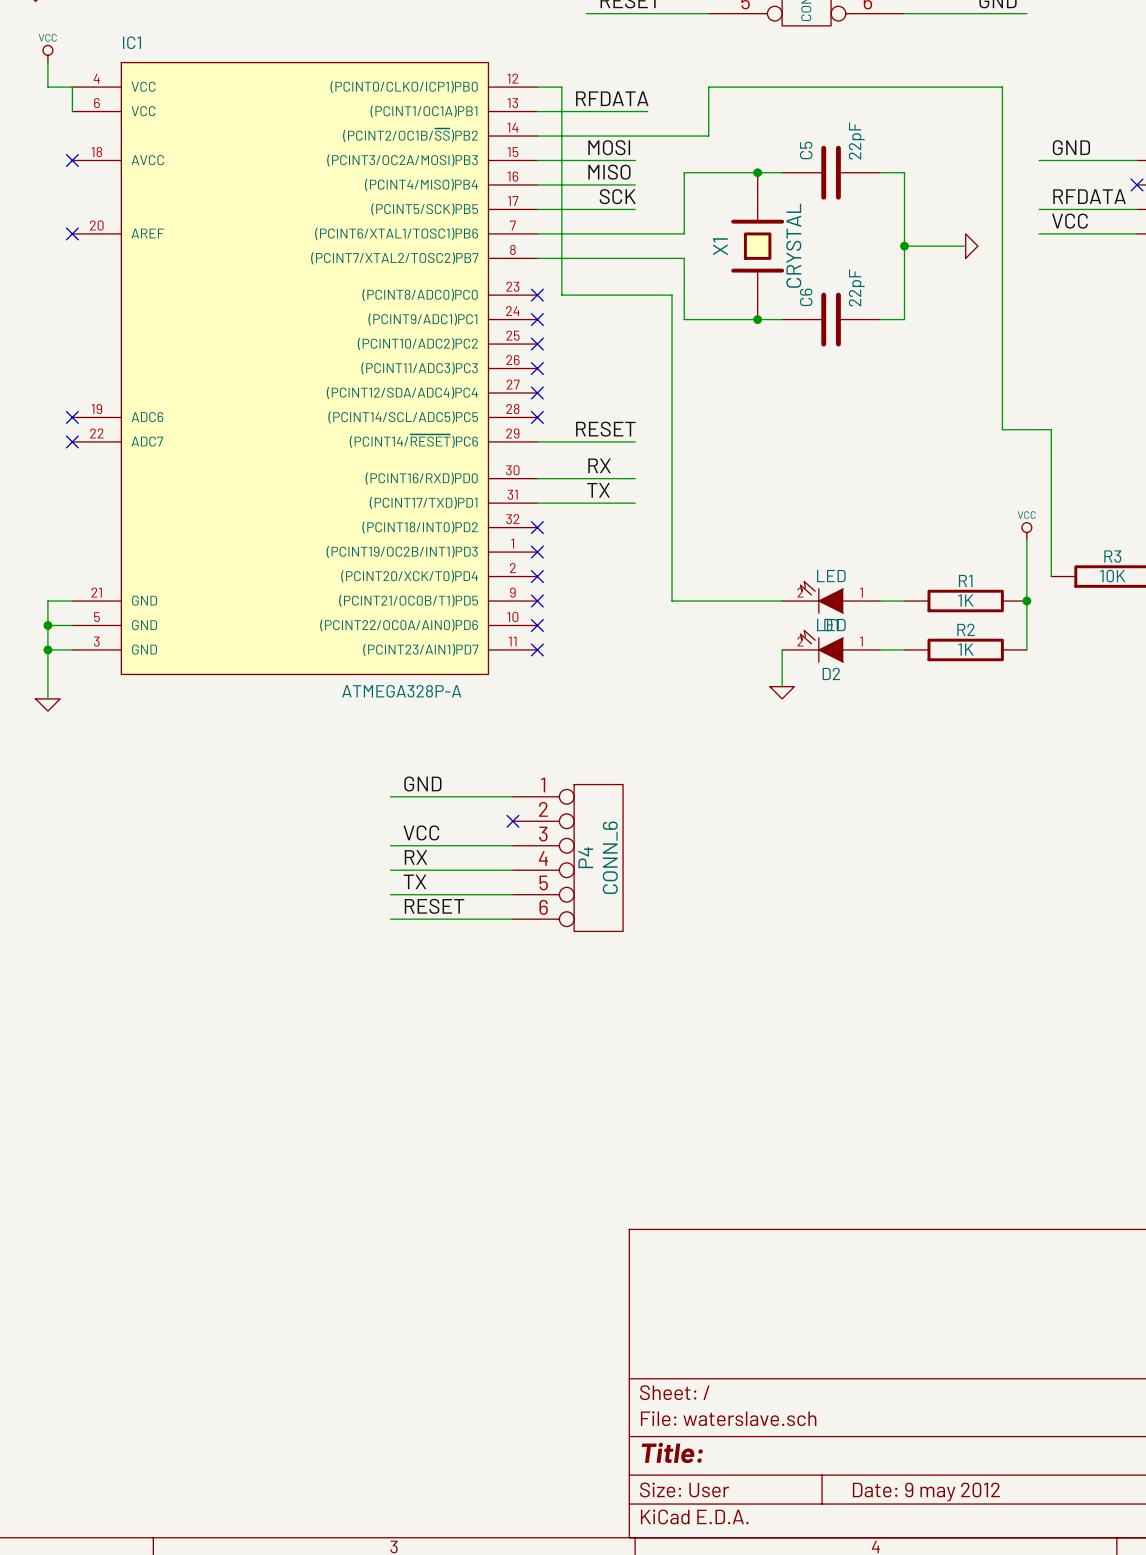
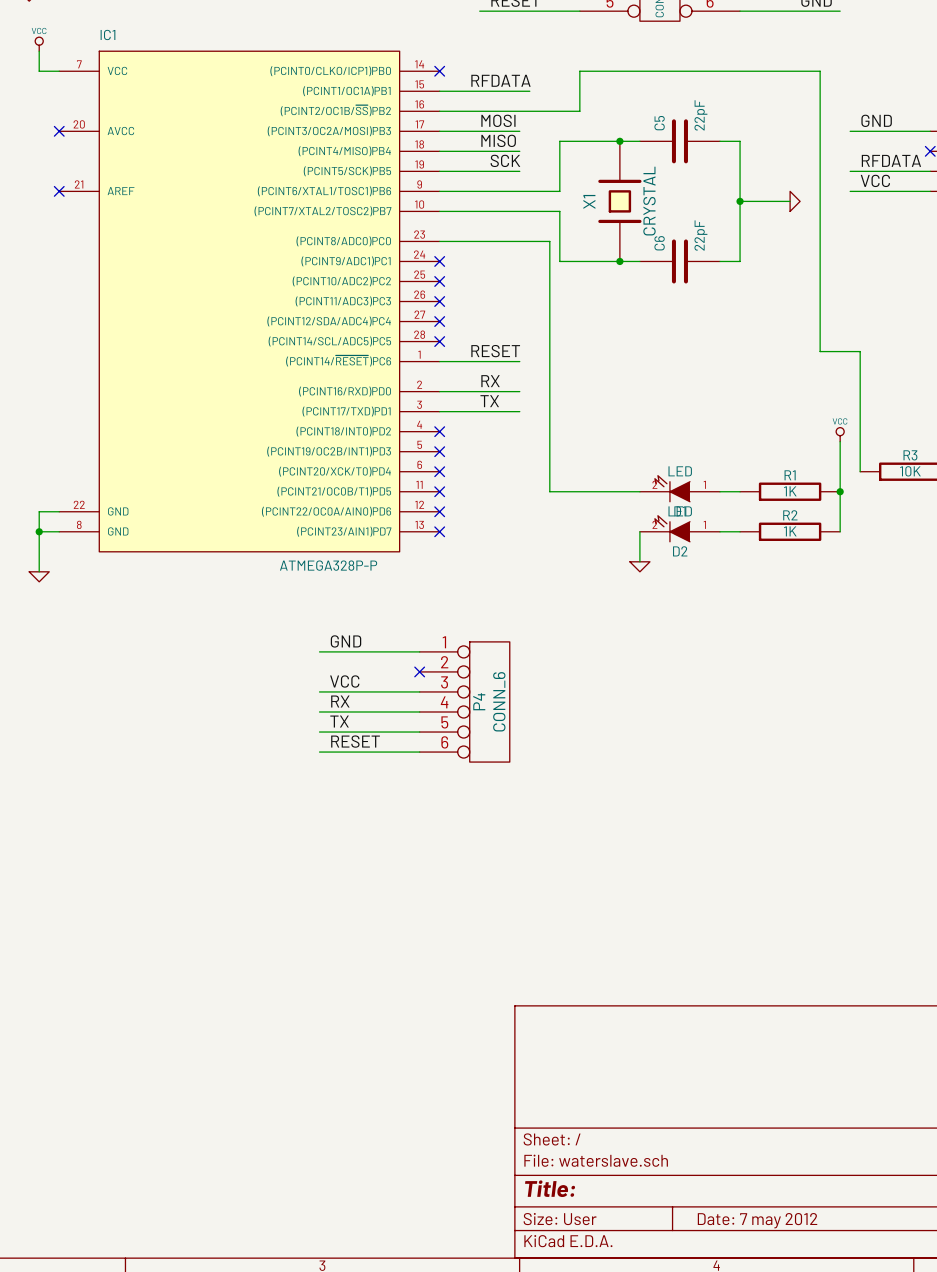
IC1 symbol: [72, 62, 538, 675] -> [59, 51, 440, 552]
wire: (72, 87) (72, 111) -> none
wire: (537, 87) (561, 87) (561, 295) -> (439, 241) (459, 241)
no-connect mark: none -> (439, 71)
no-connect mark: (537, 295) -> none
no-connect mark: (72, 417) -> none
no-connect mark: (72, 441) -> none
wire: (72, 601) (47, 601) (47, 625) -> none
junction: (47, 625) -> none
IC1 value: ATMEGA328P-A (401, 691) -> ATMEGA328P-P (328, 565)
title block: Date: 9 may 2012 (926, 1491) -> Date: 7 may 2012 (757, 1220)

